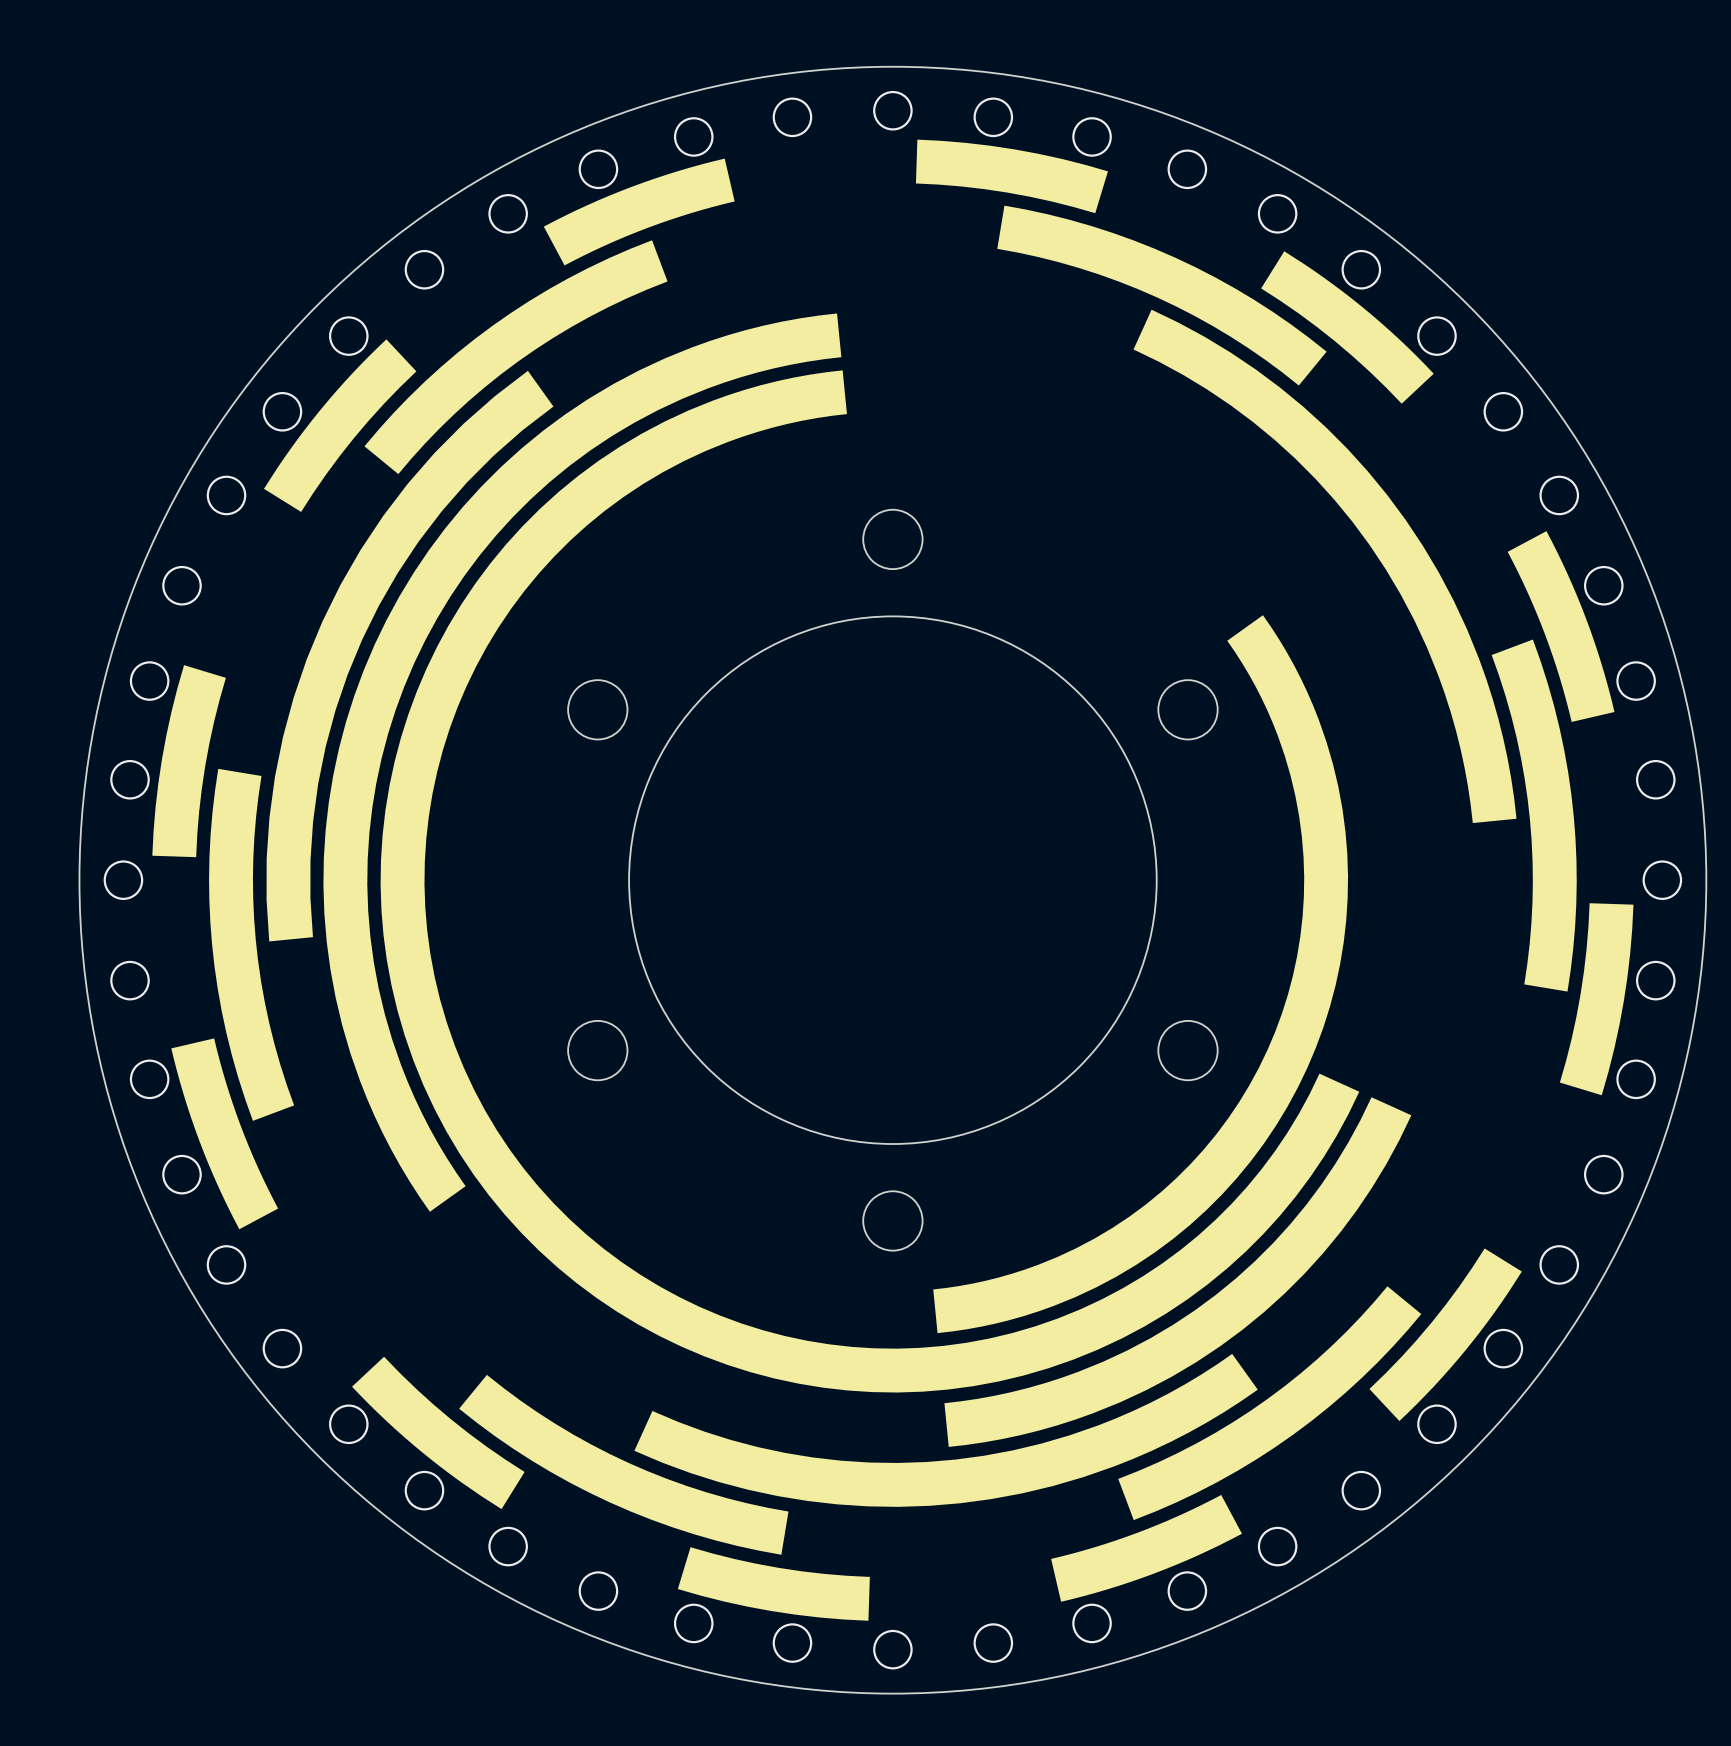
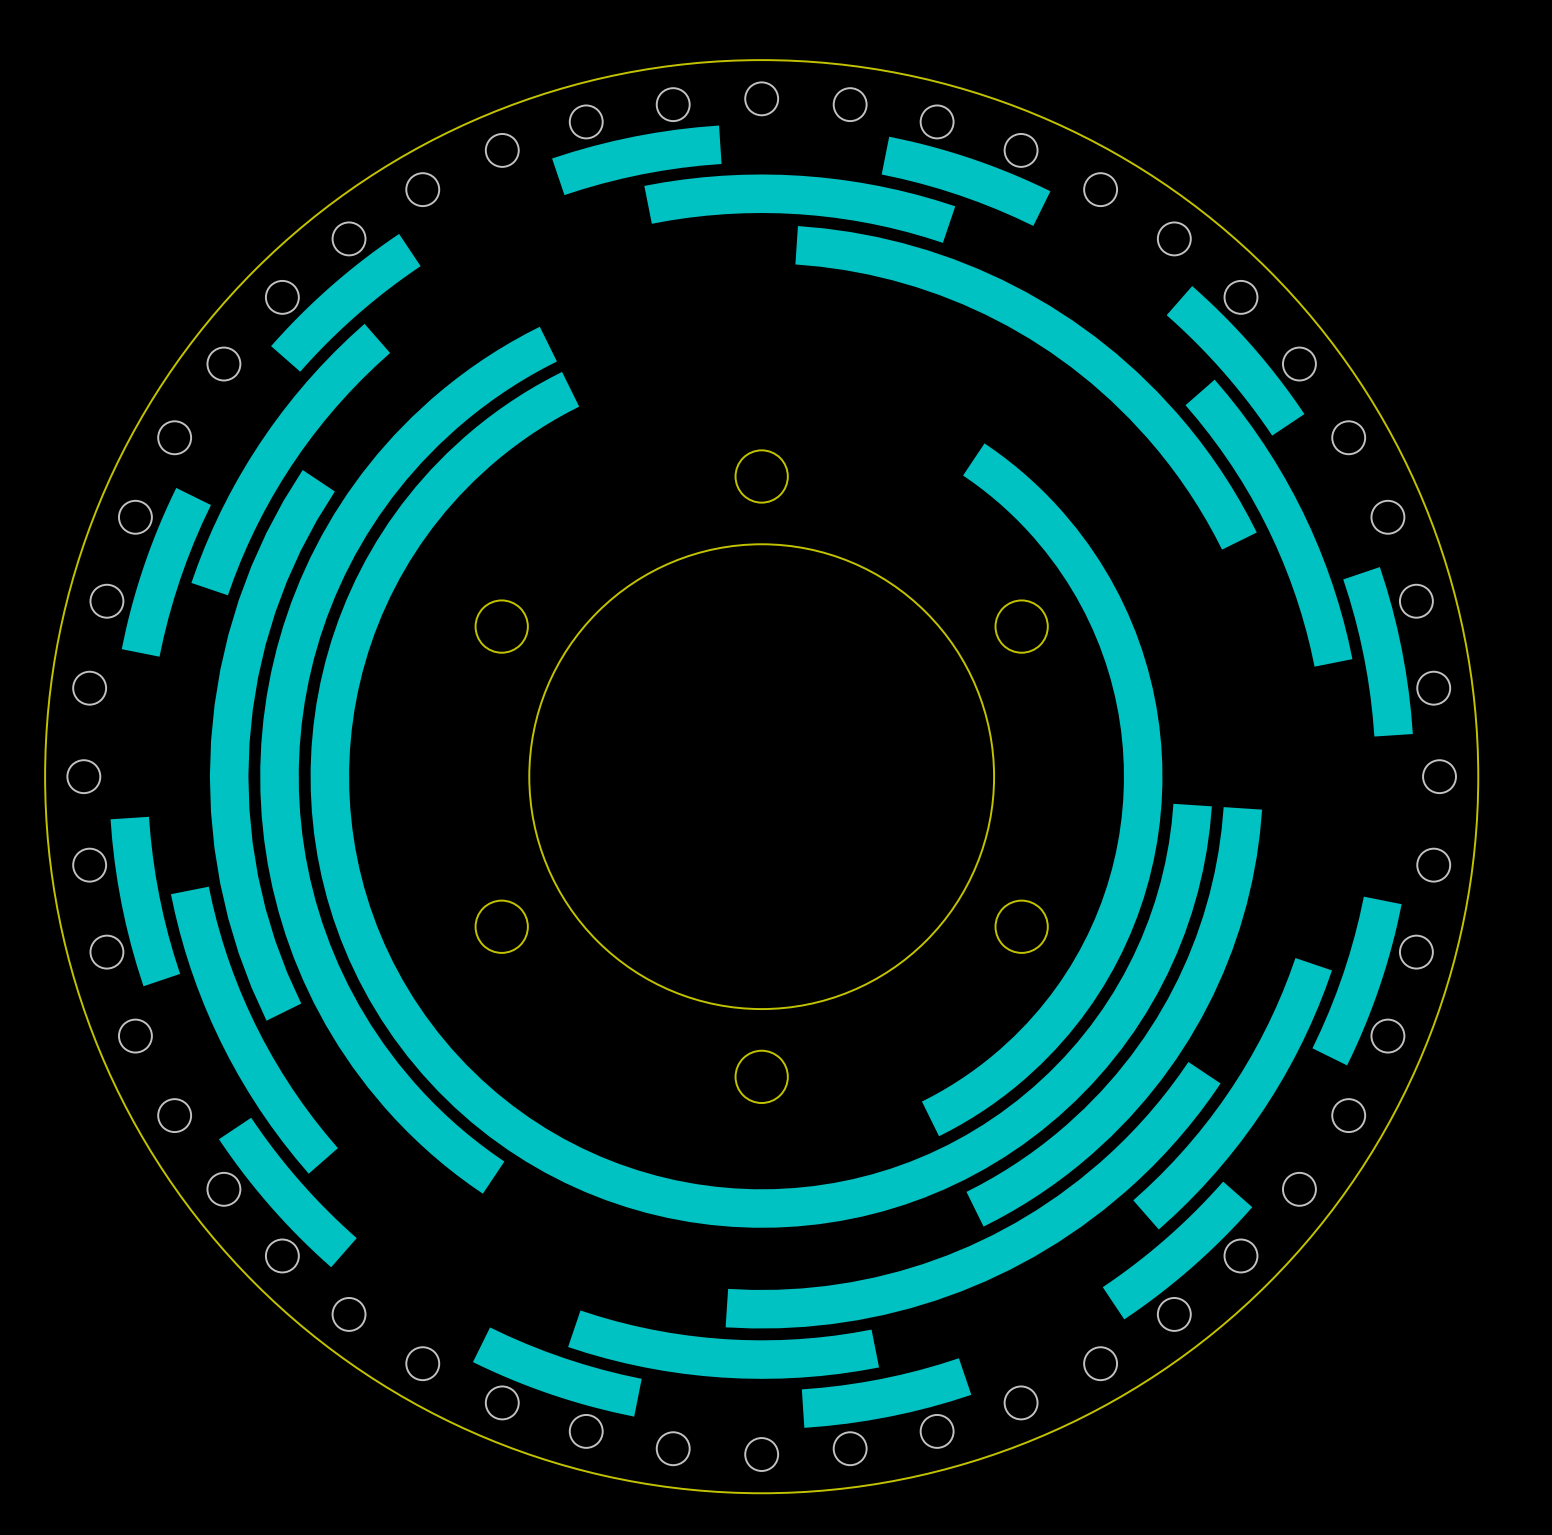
drawing shape: [152, 139, 1634, 1621] -> [110, 125, 1413, 1428]

